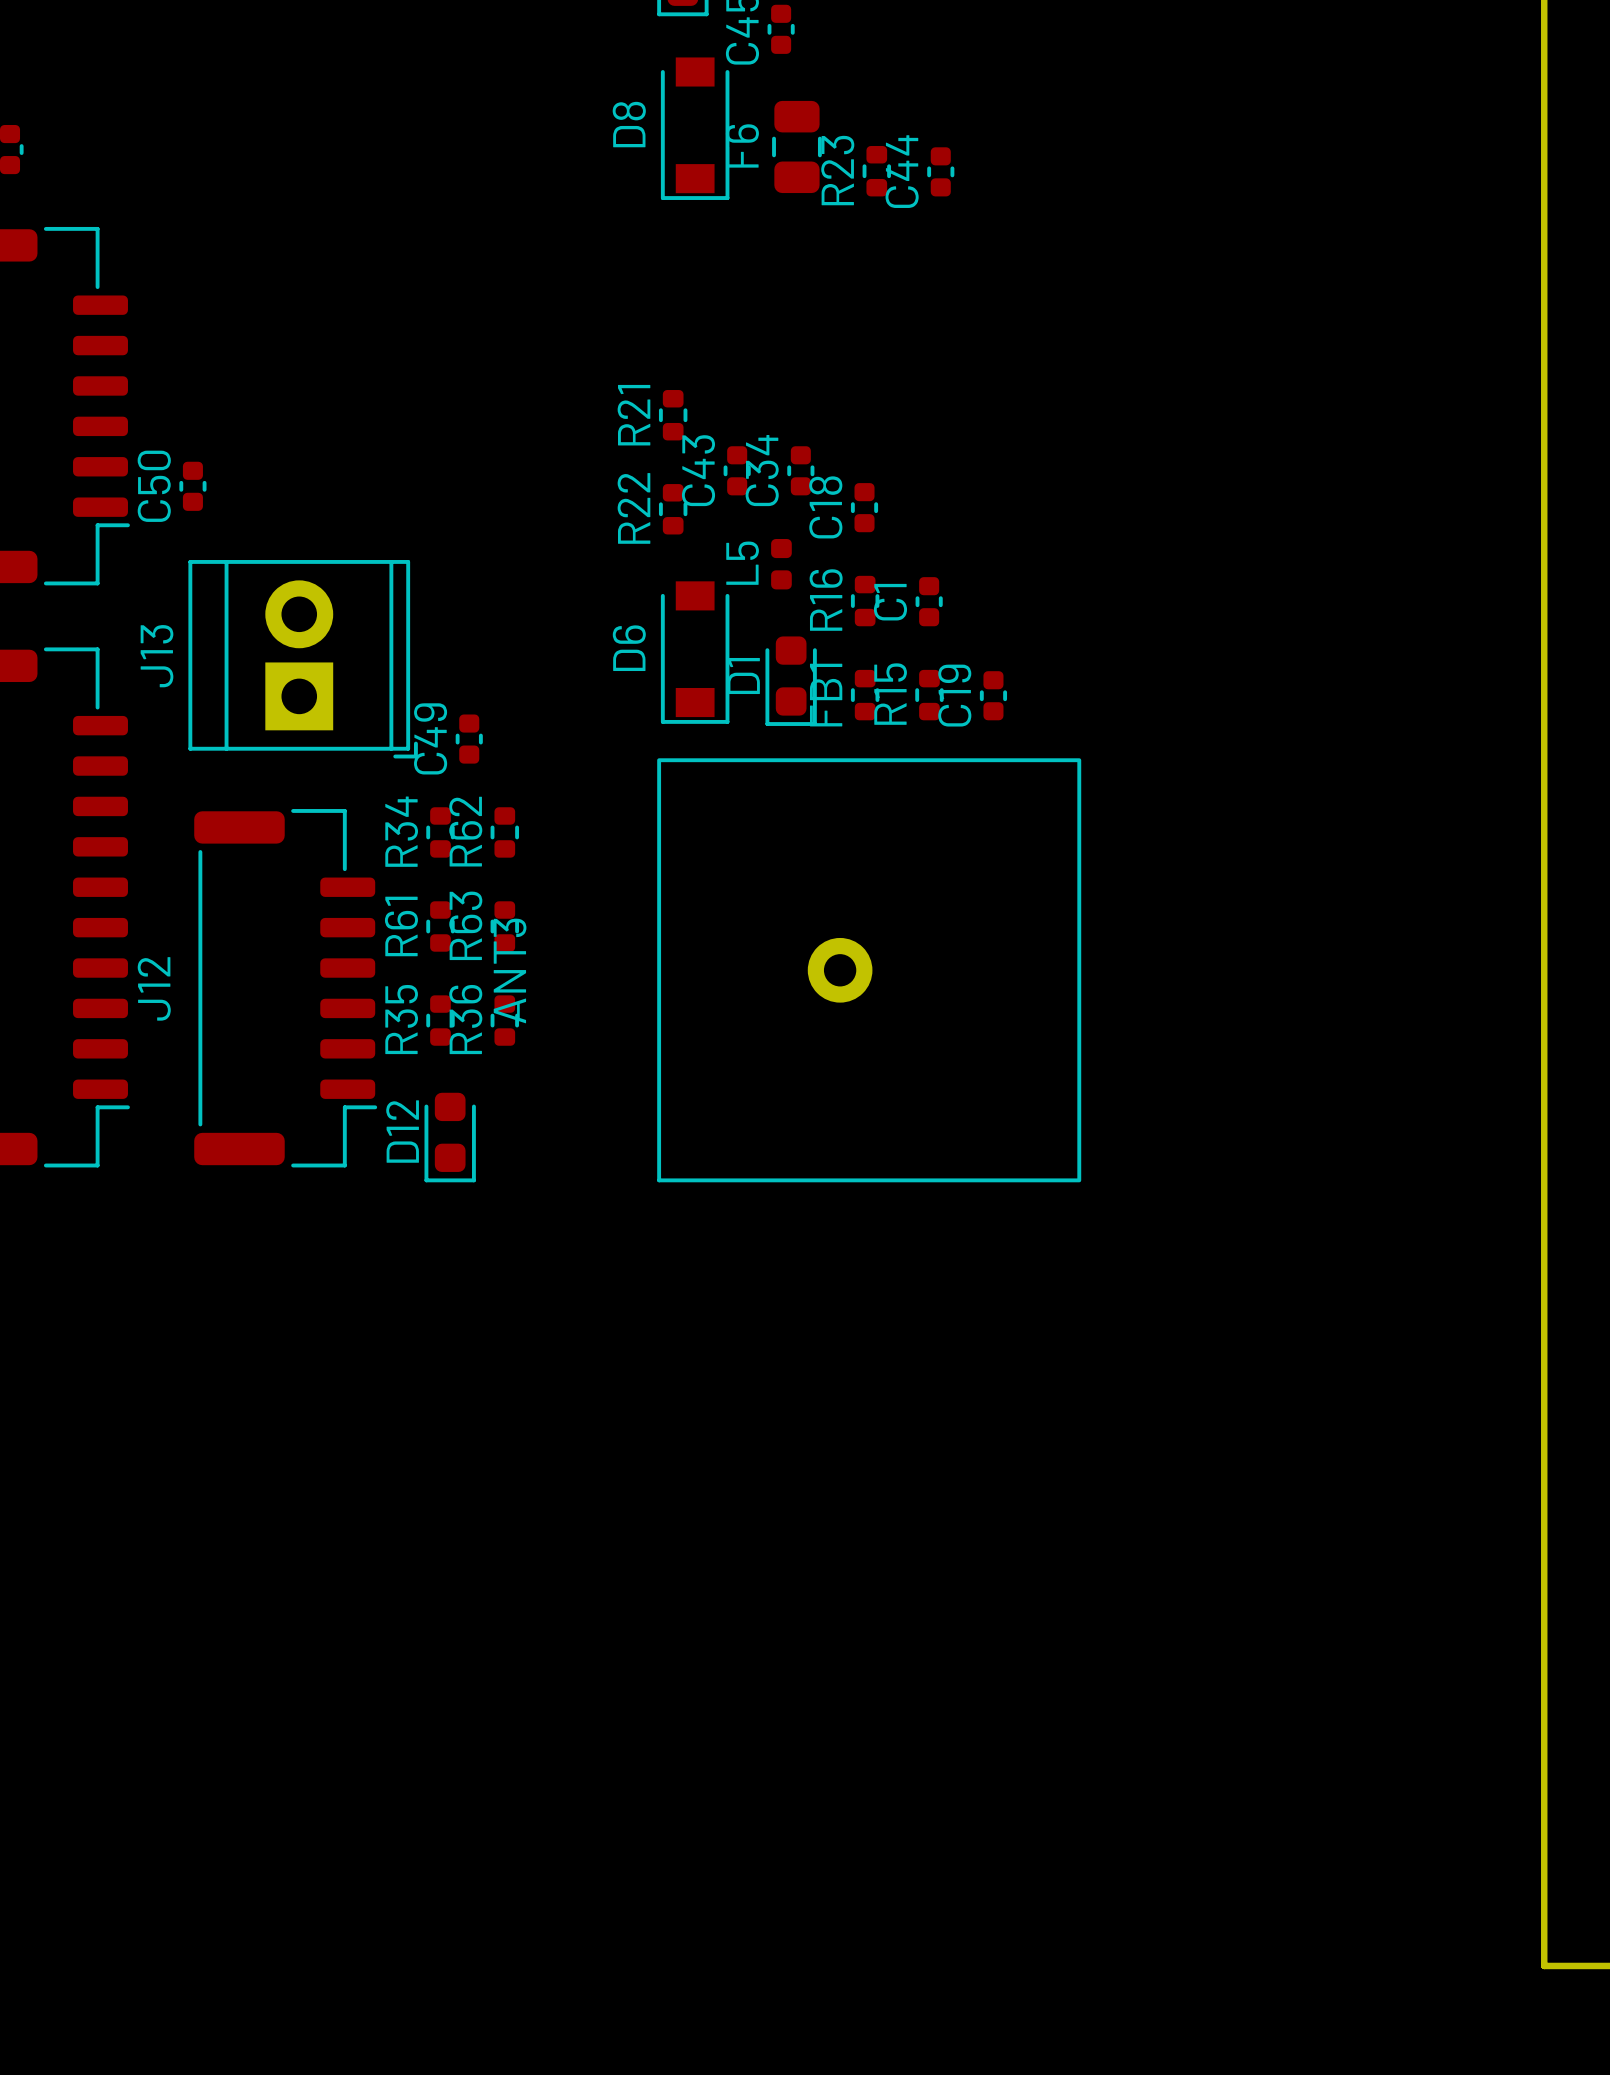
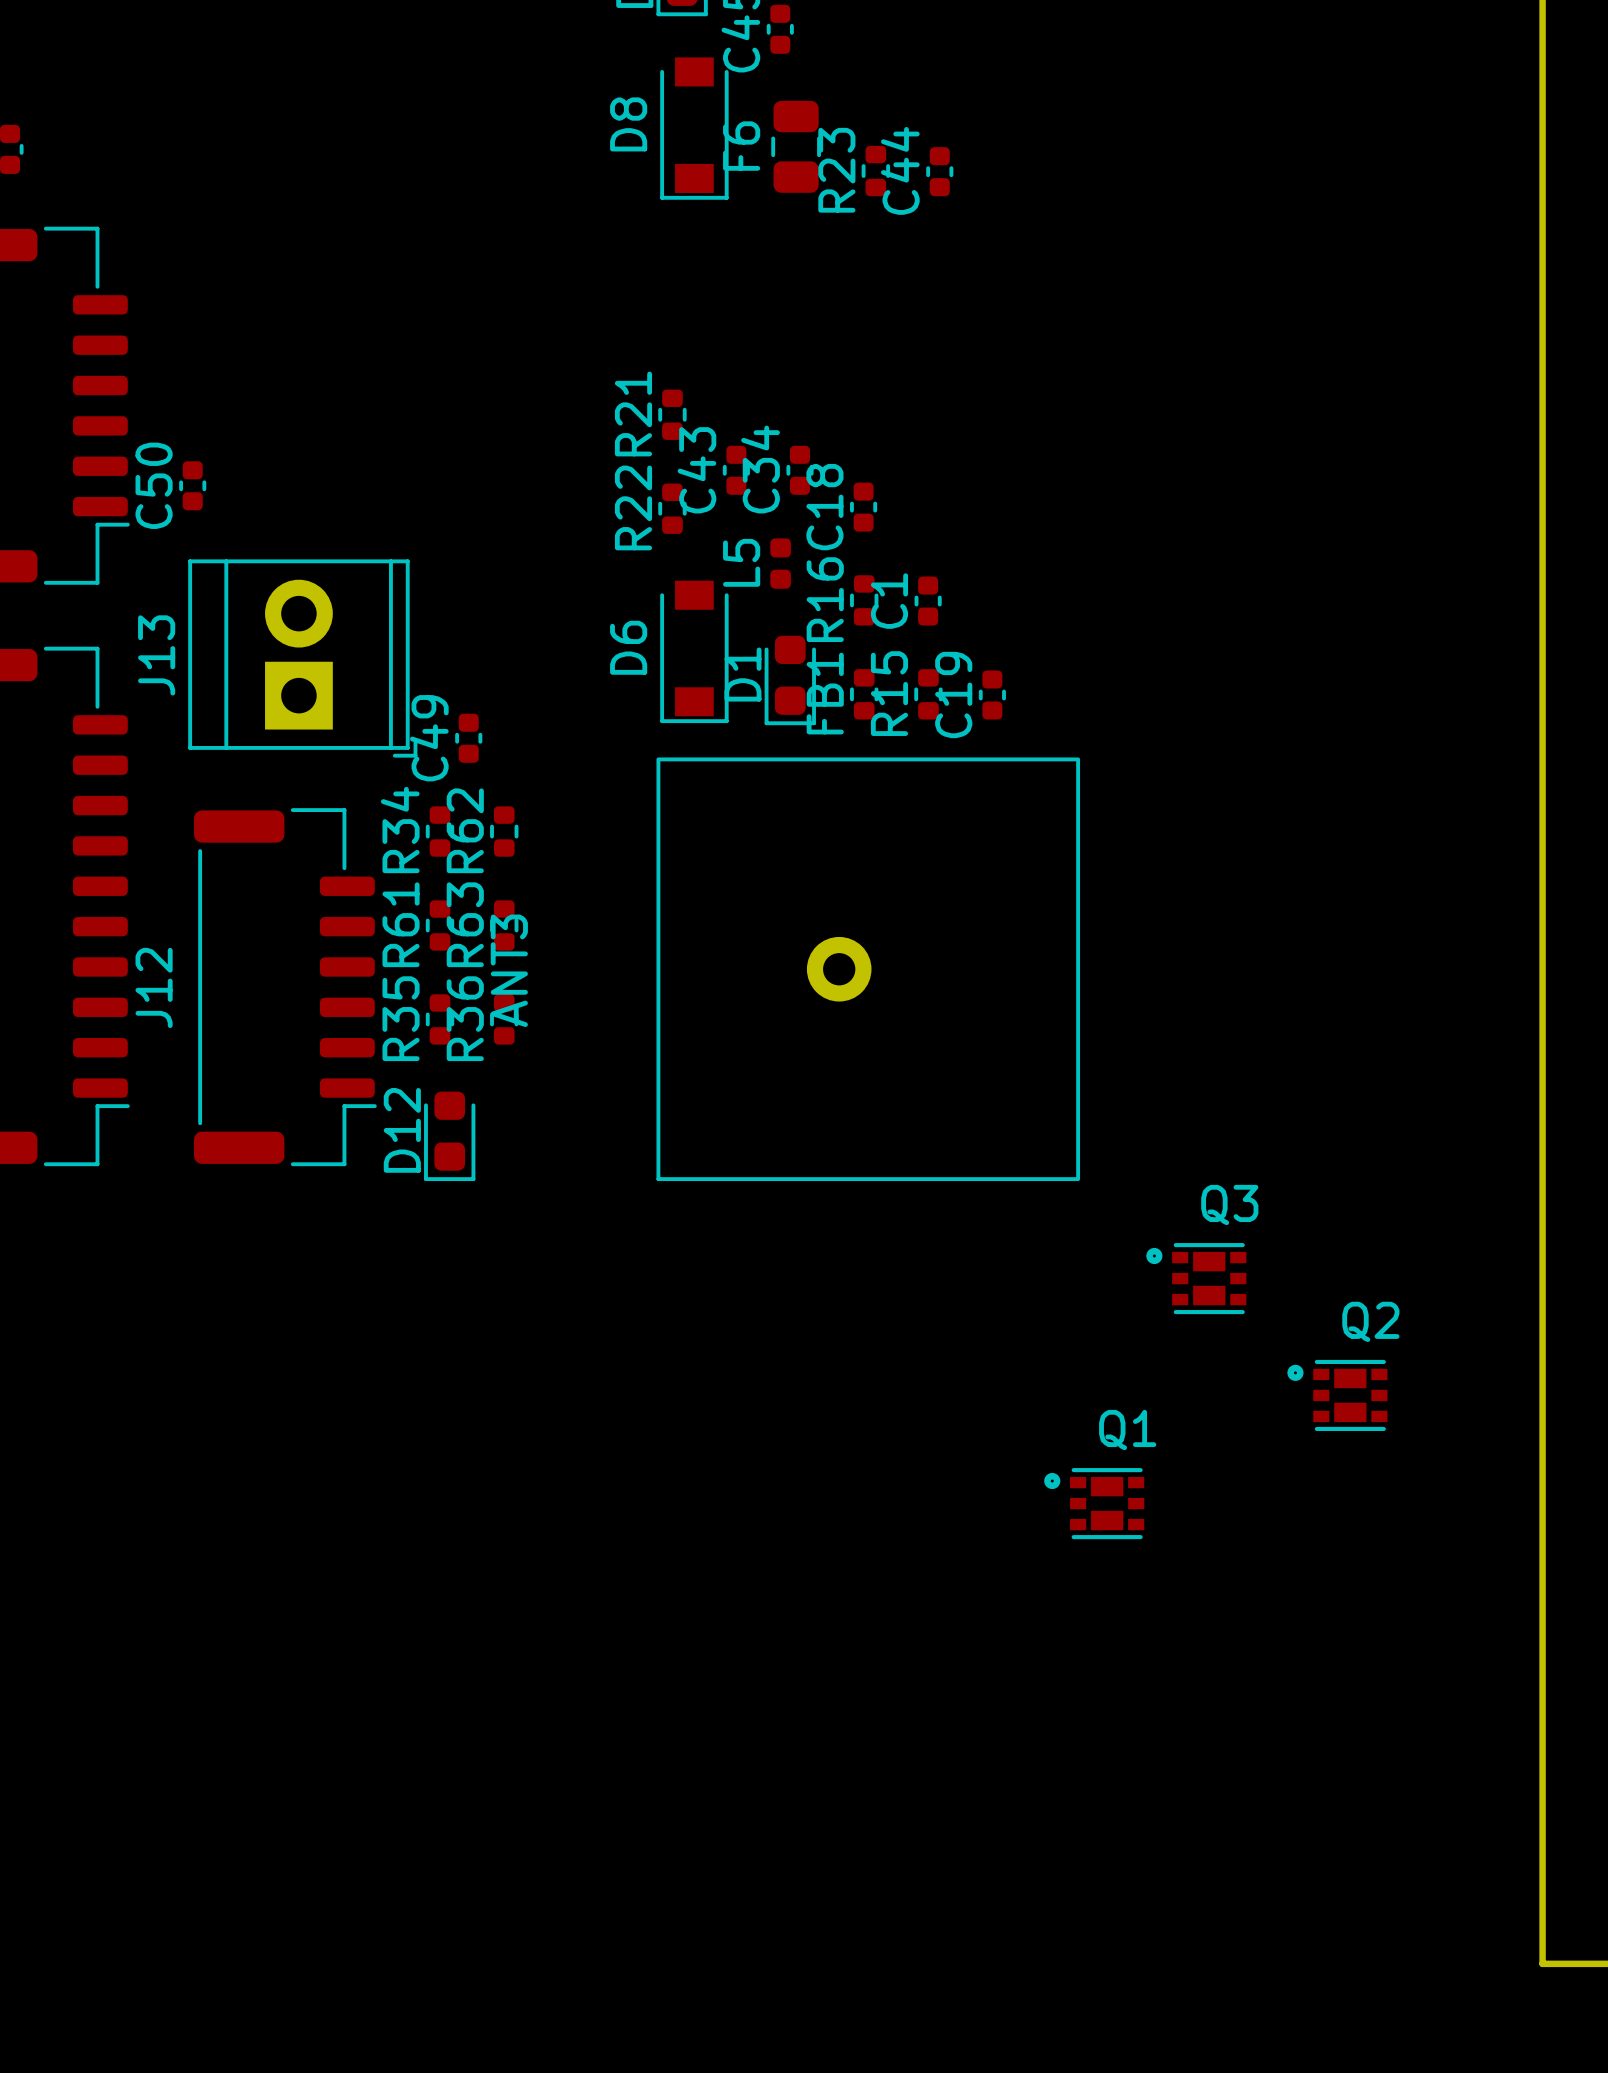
Q3: none -> (1196, 1278)
Q2: none -> (1337, 1395)
Q1: none -> (1094, 1503)

